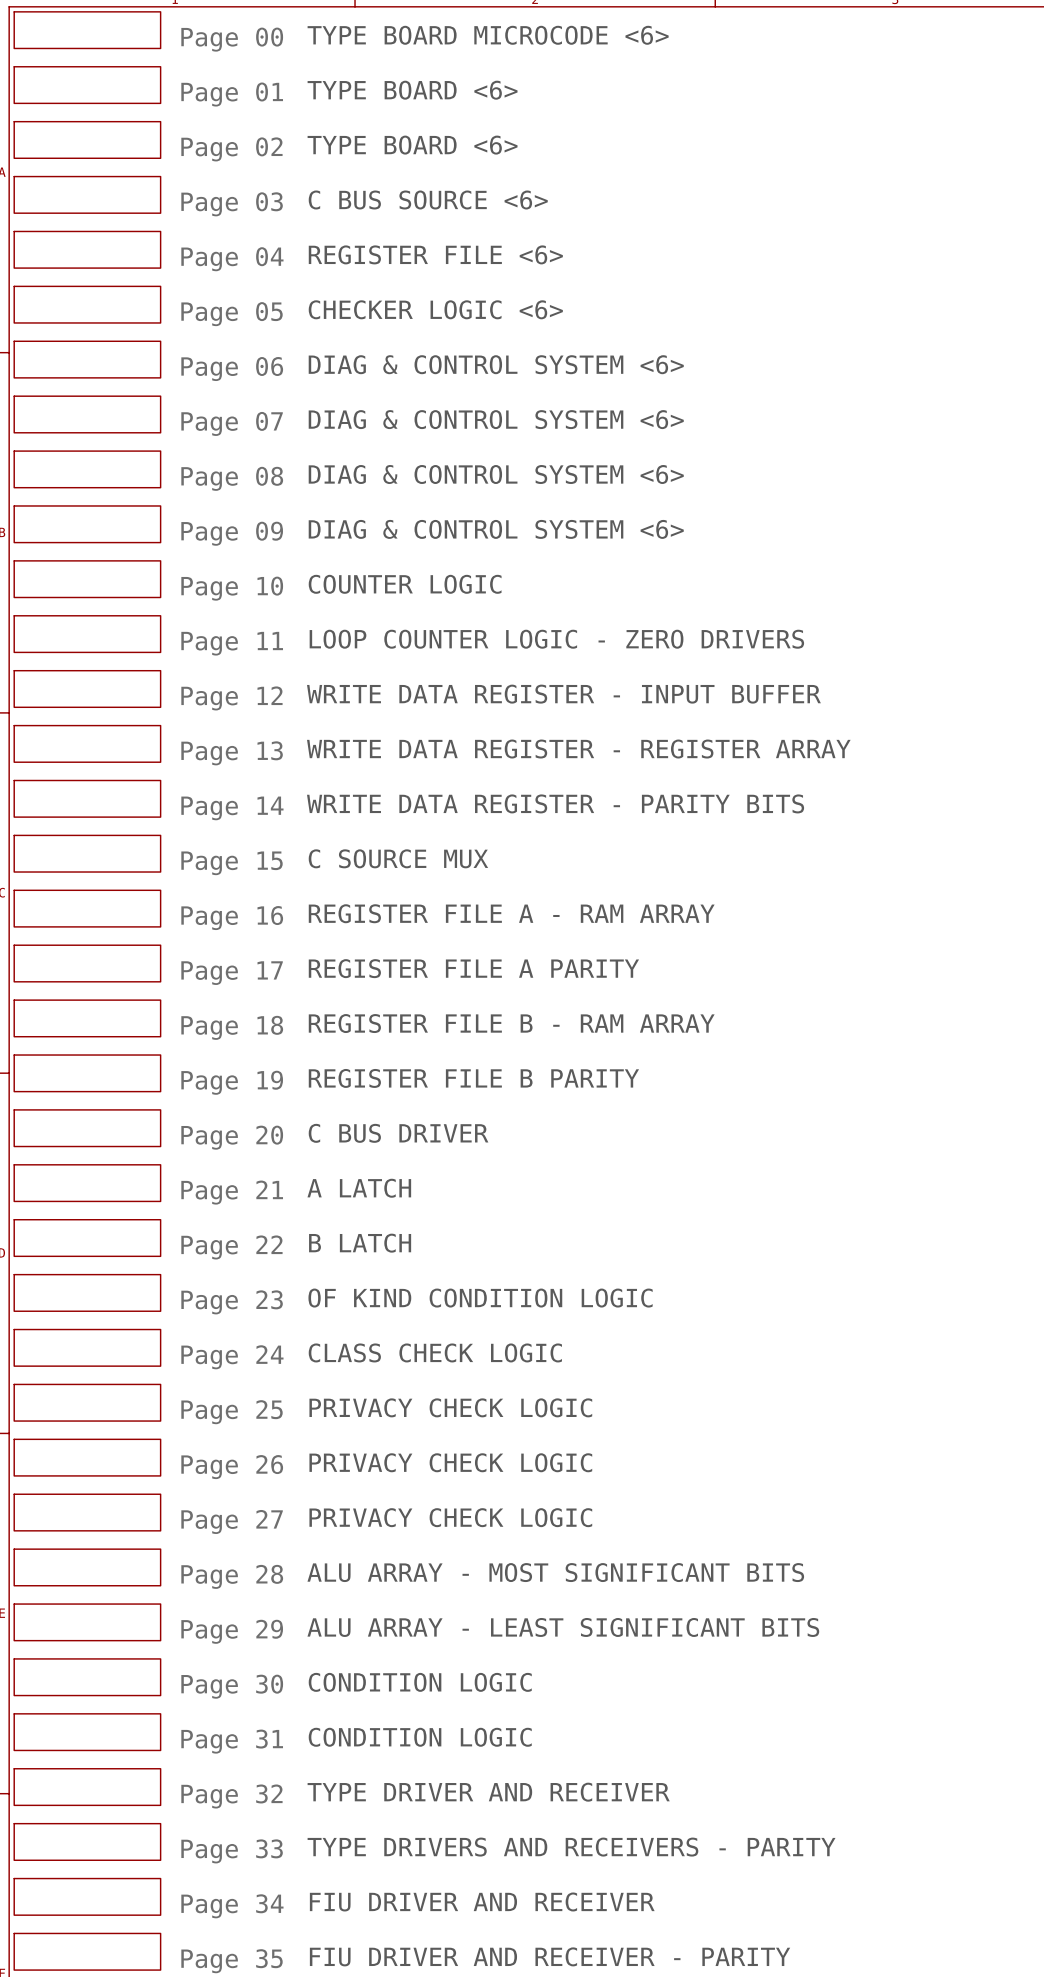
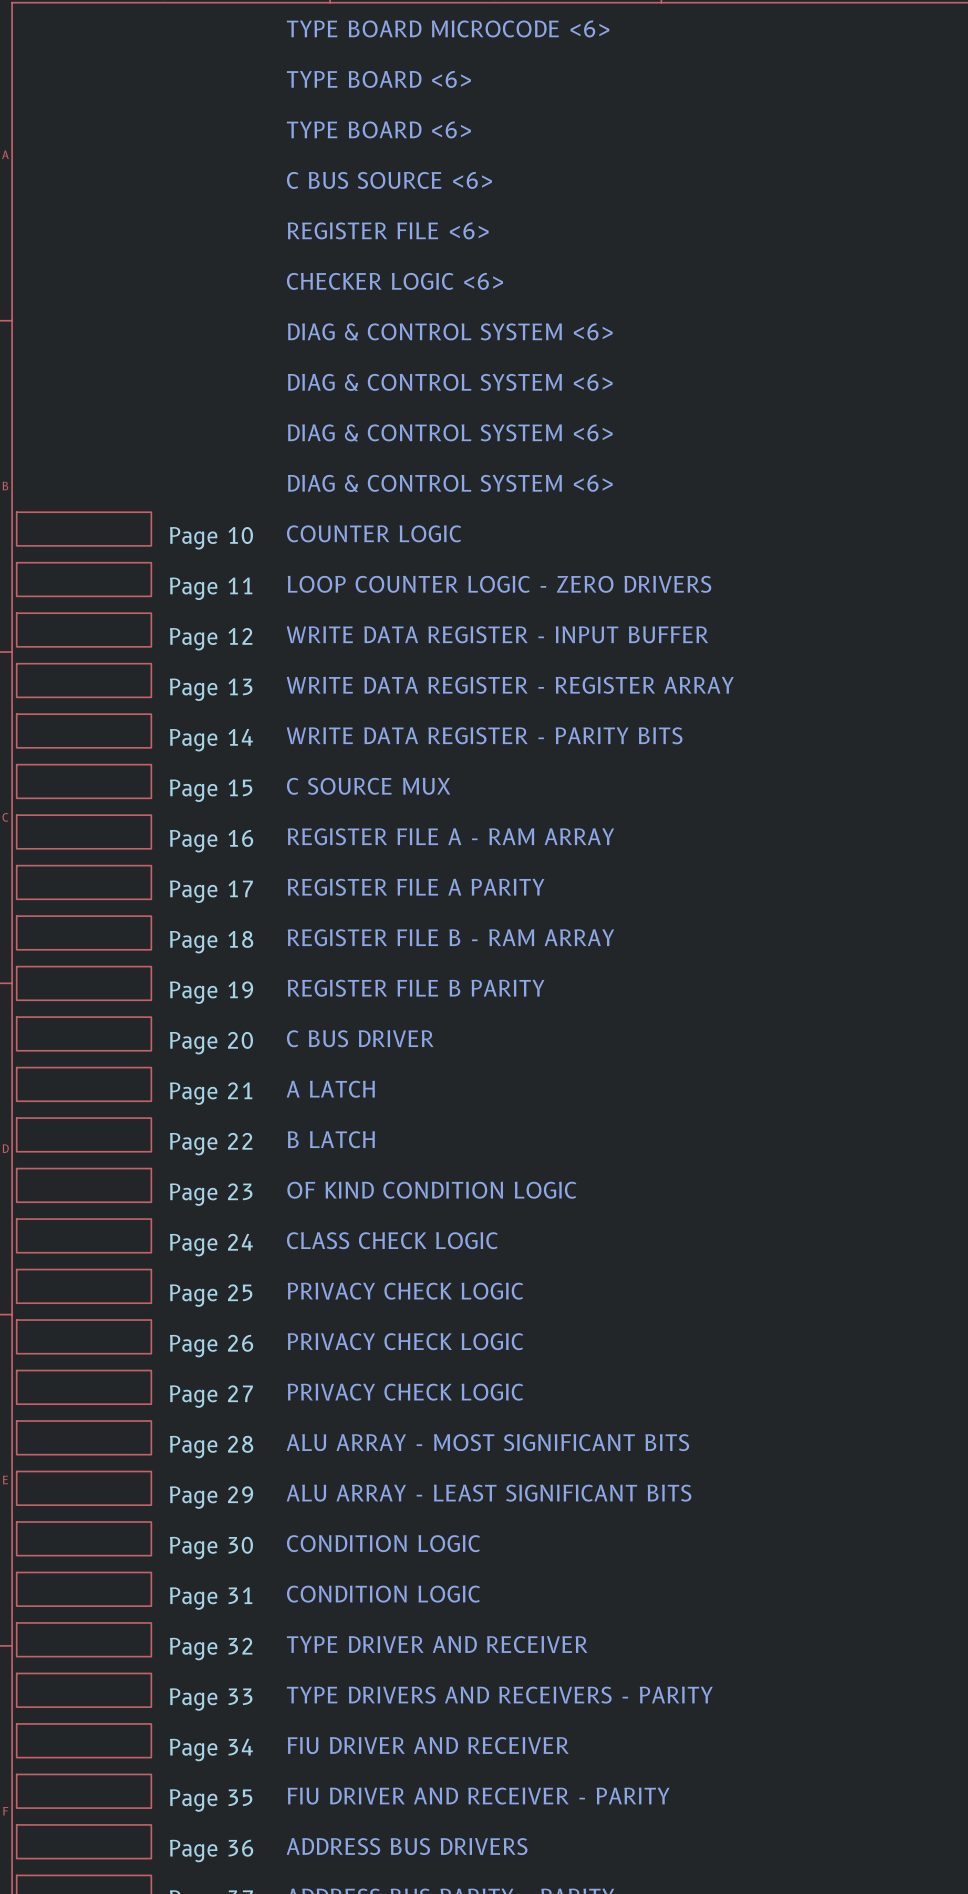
sheet Page 00: (87, 30) -> none
sheet Page 01: (87, 85) -> none
sheet Page 02: (87, 139) -> none
sheet Page 03: (87, 194) -> none
sheet Page 04: (87, 249) -> none
sheet Page 05: (87, 304) -> none
sheet Page 06: (87, 359) -> none
sheet Page 07: (87, 414) -> none
sheet Page 08: (87, 469) -> none
sheet Page 09: (87, 524) -> none

